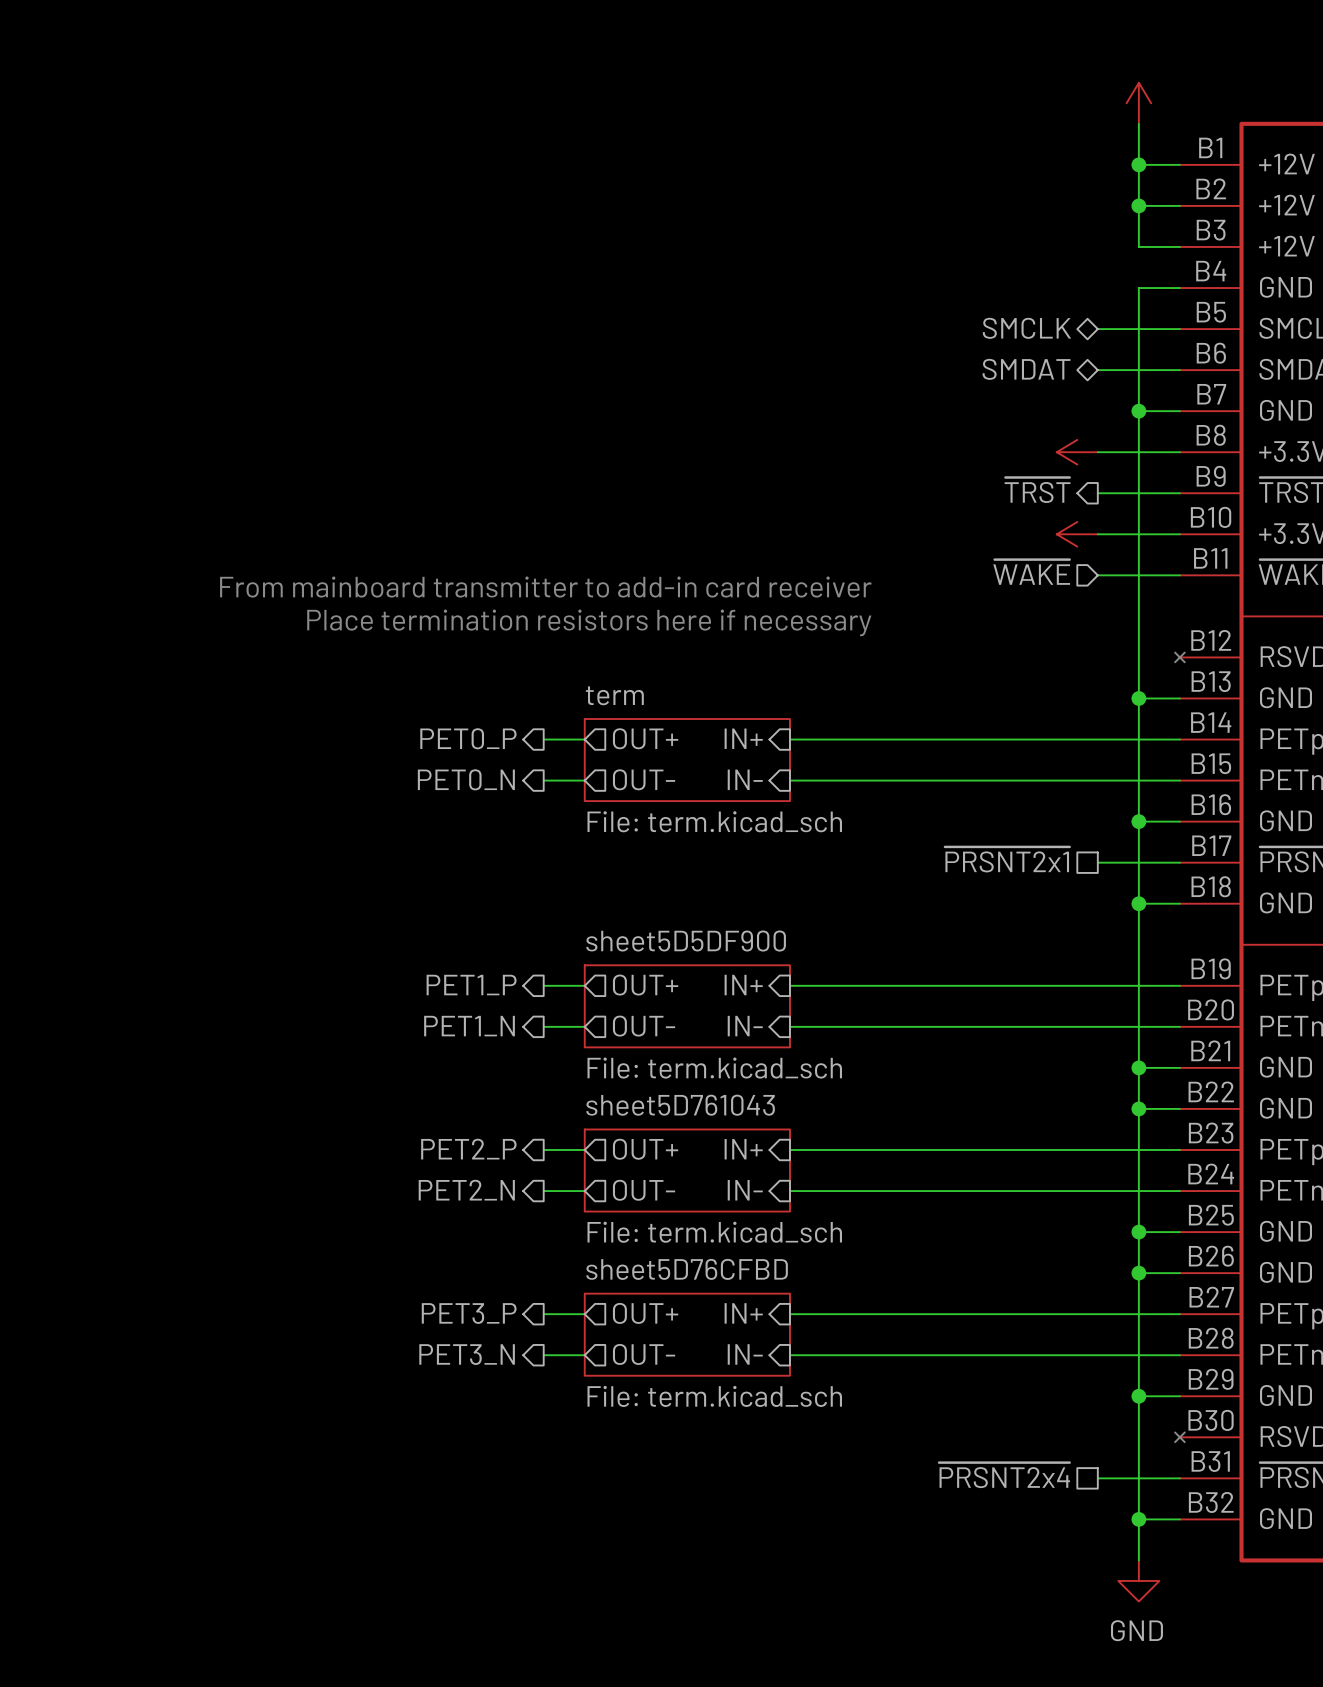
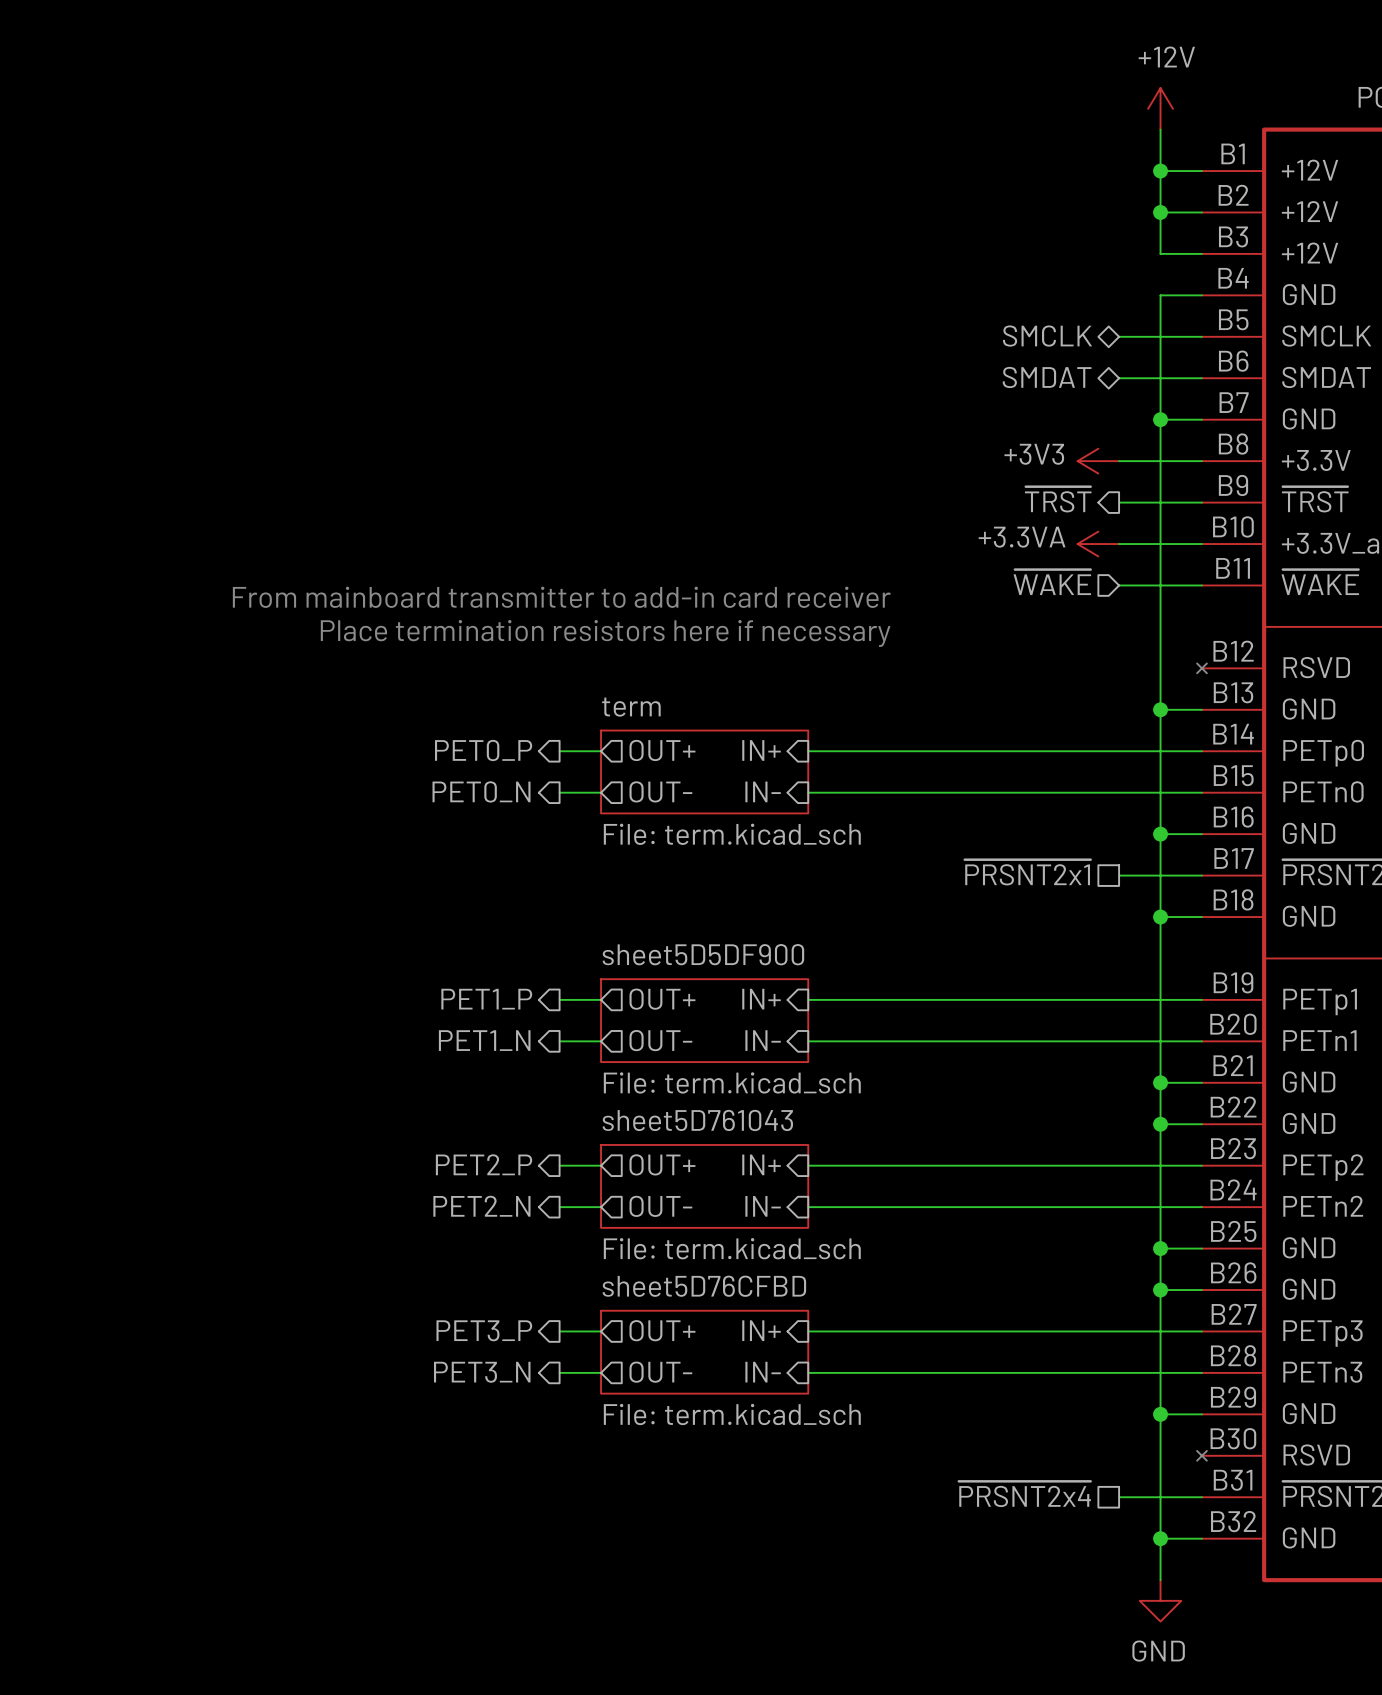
power symbol text: none -> +12V (1166, 57)
power symbol text: none -> +3V3 (1034, 454)
power symbol text: none -> +3.3VA (1022, 537)

